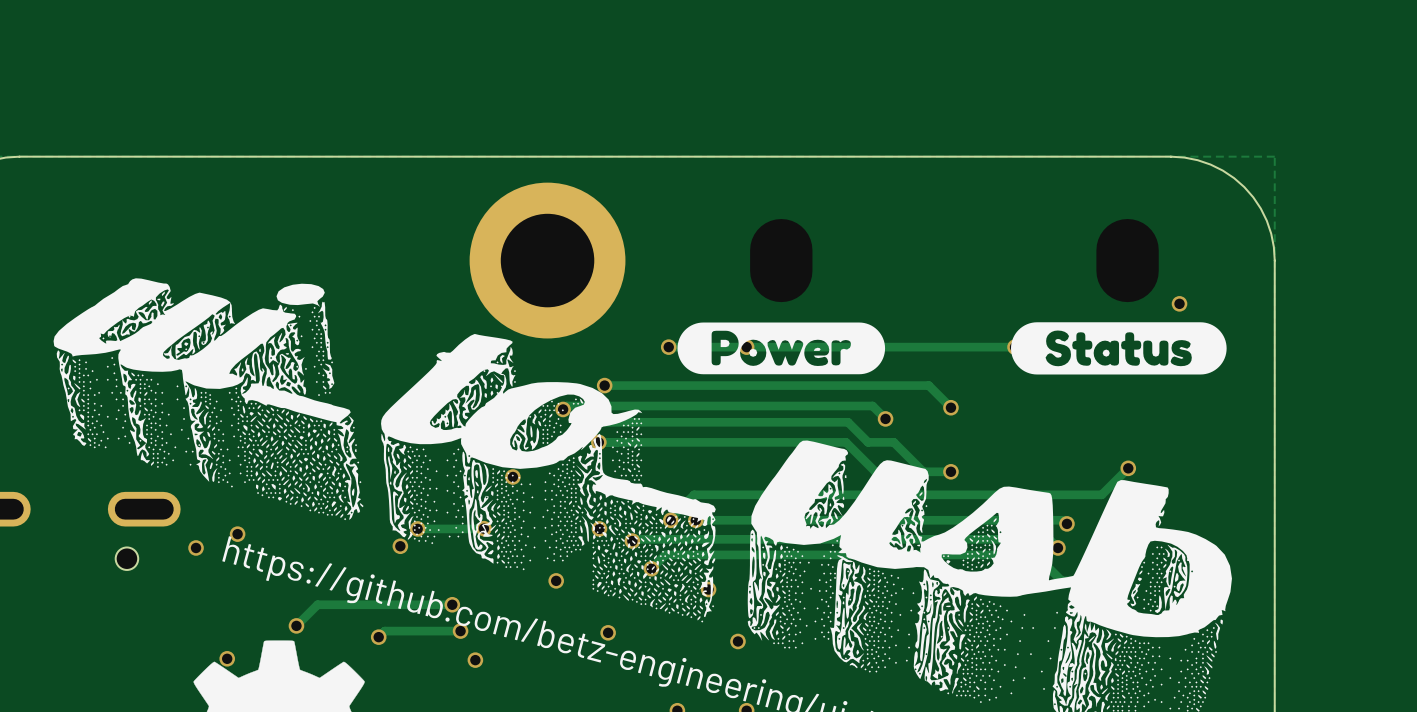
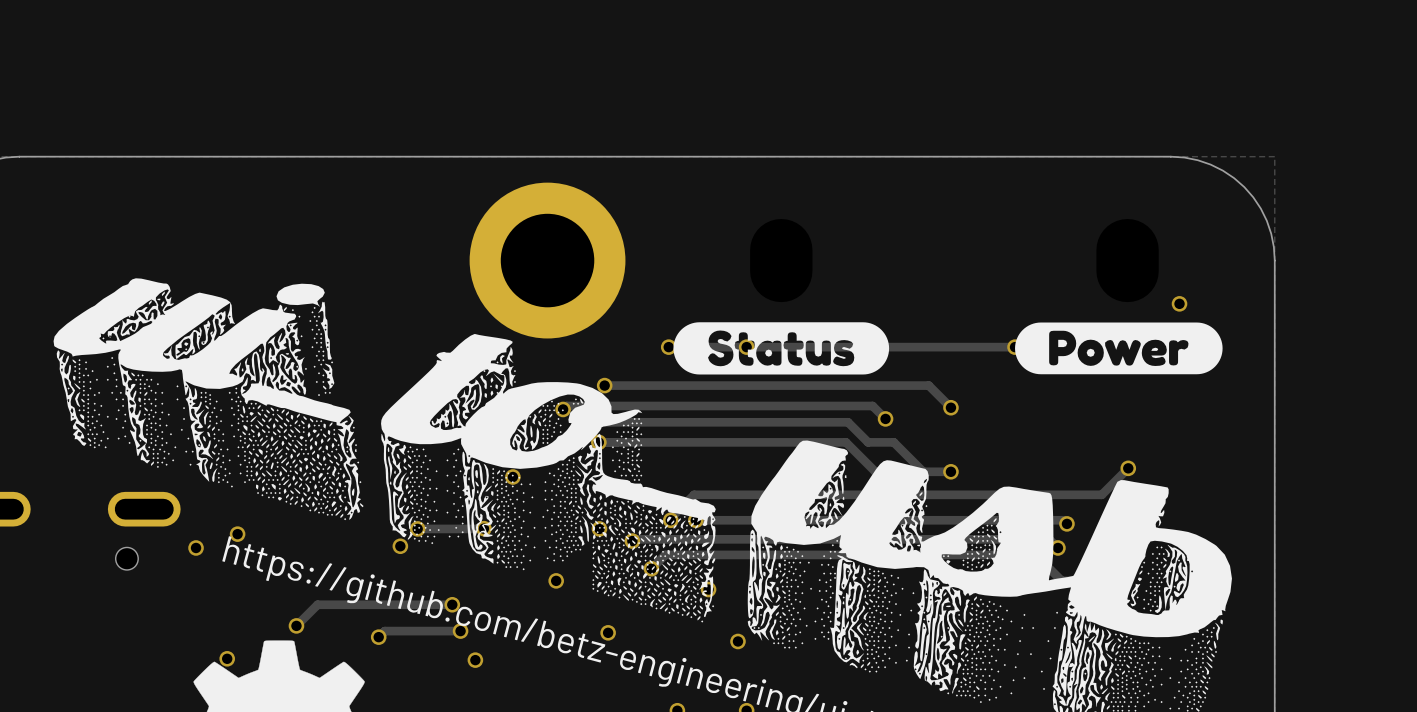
drawing position: (781, 348) -> (1118, 348)
drawing position: (1118, 348) -> (781, 348)

